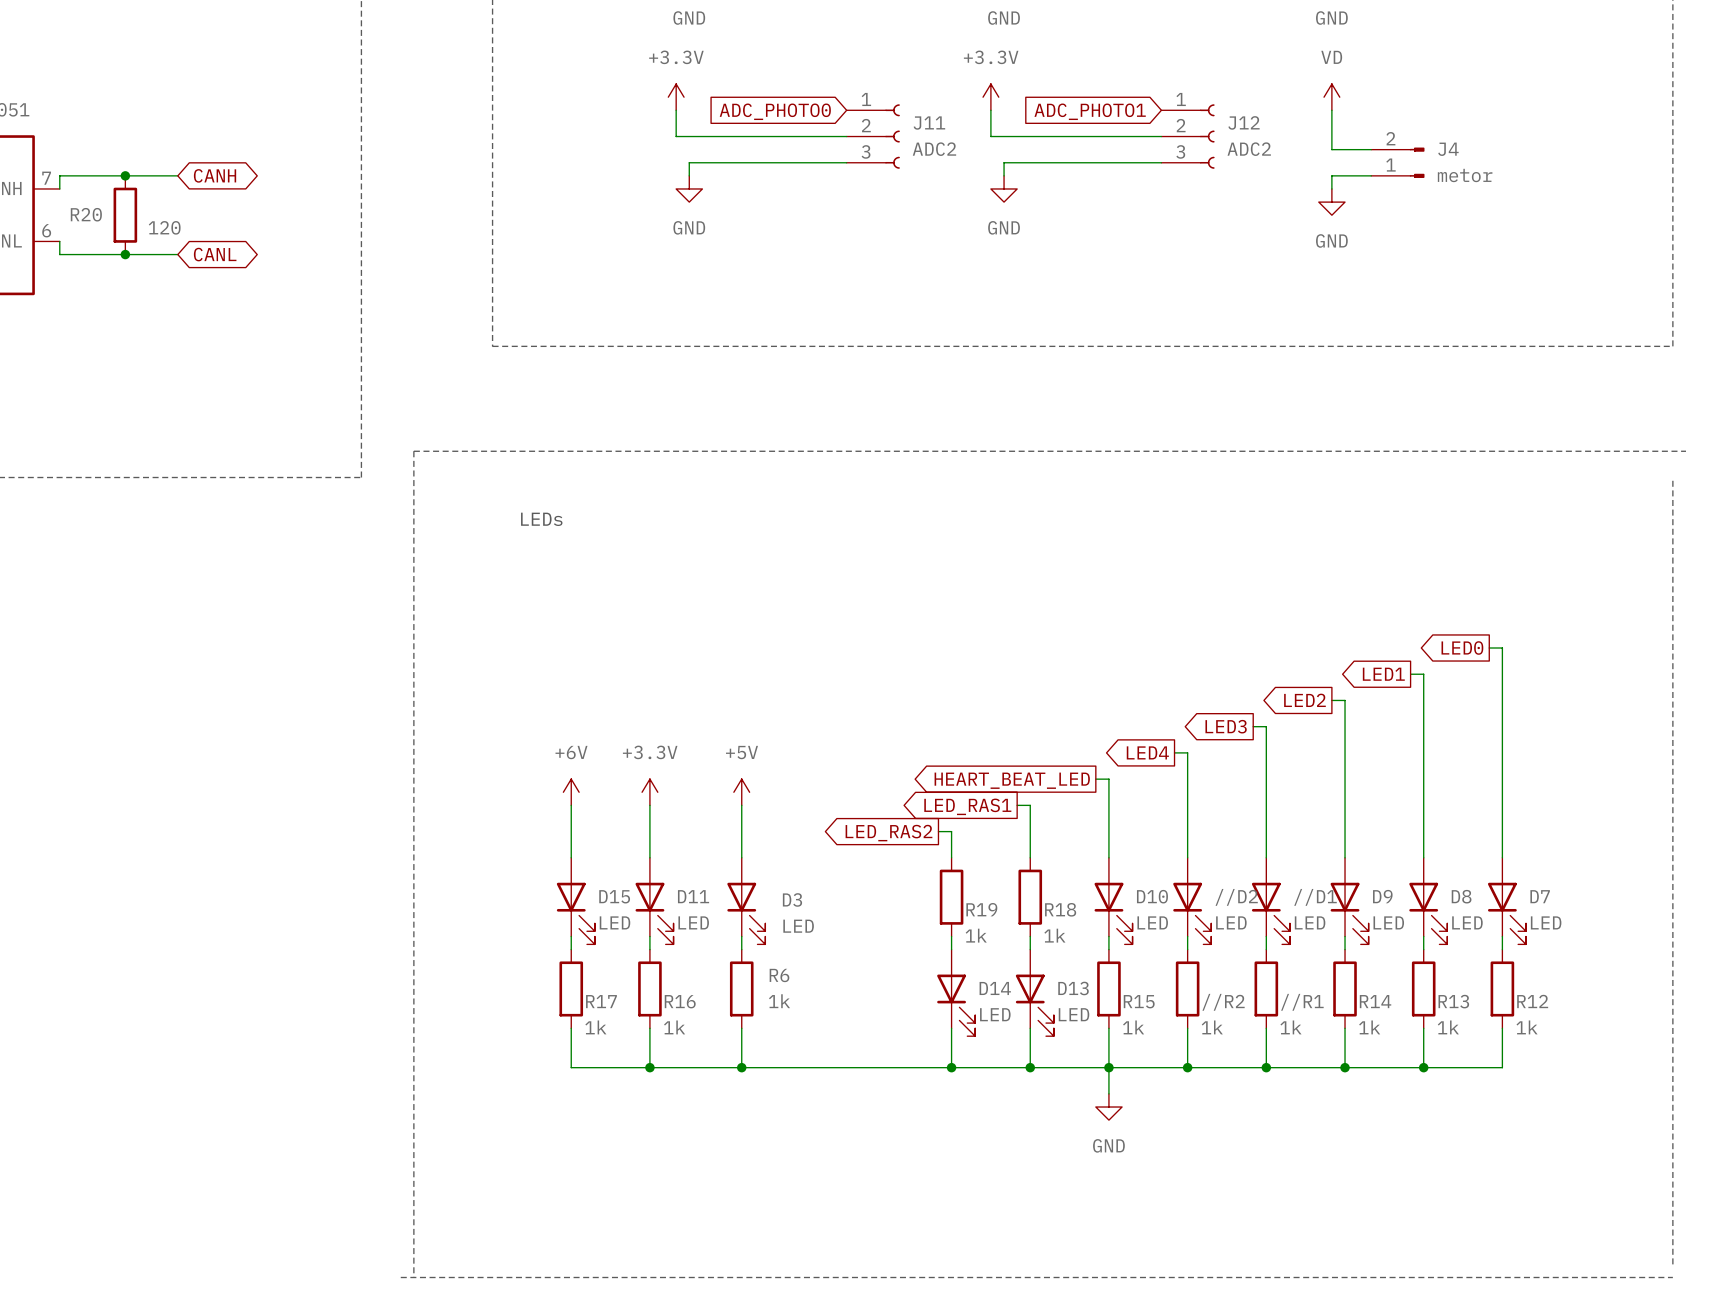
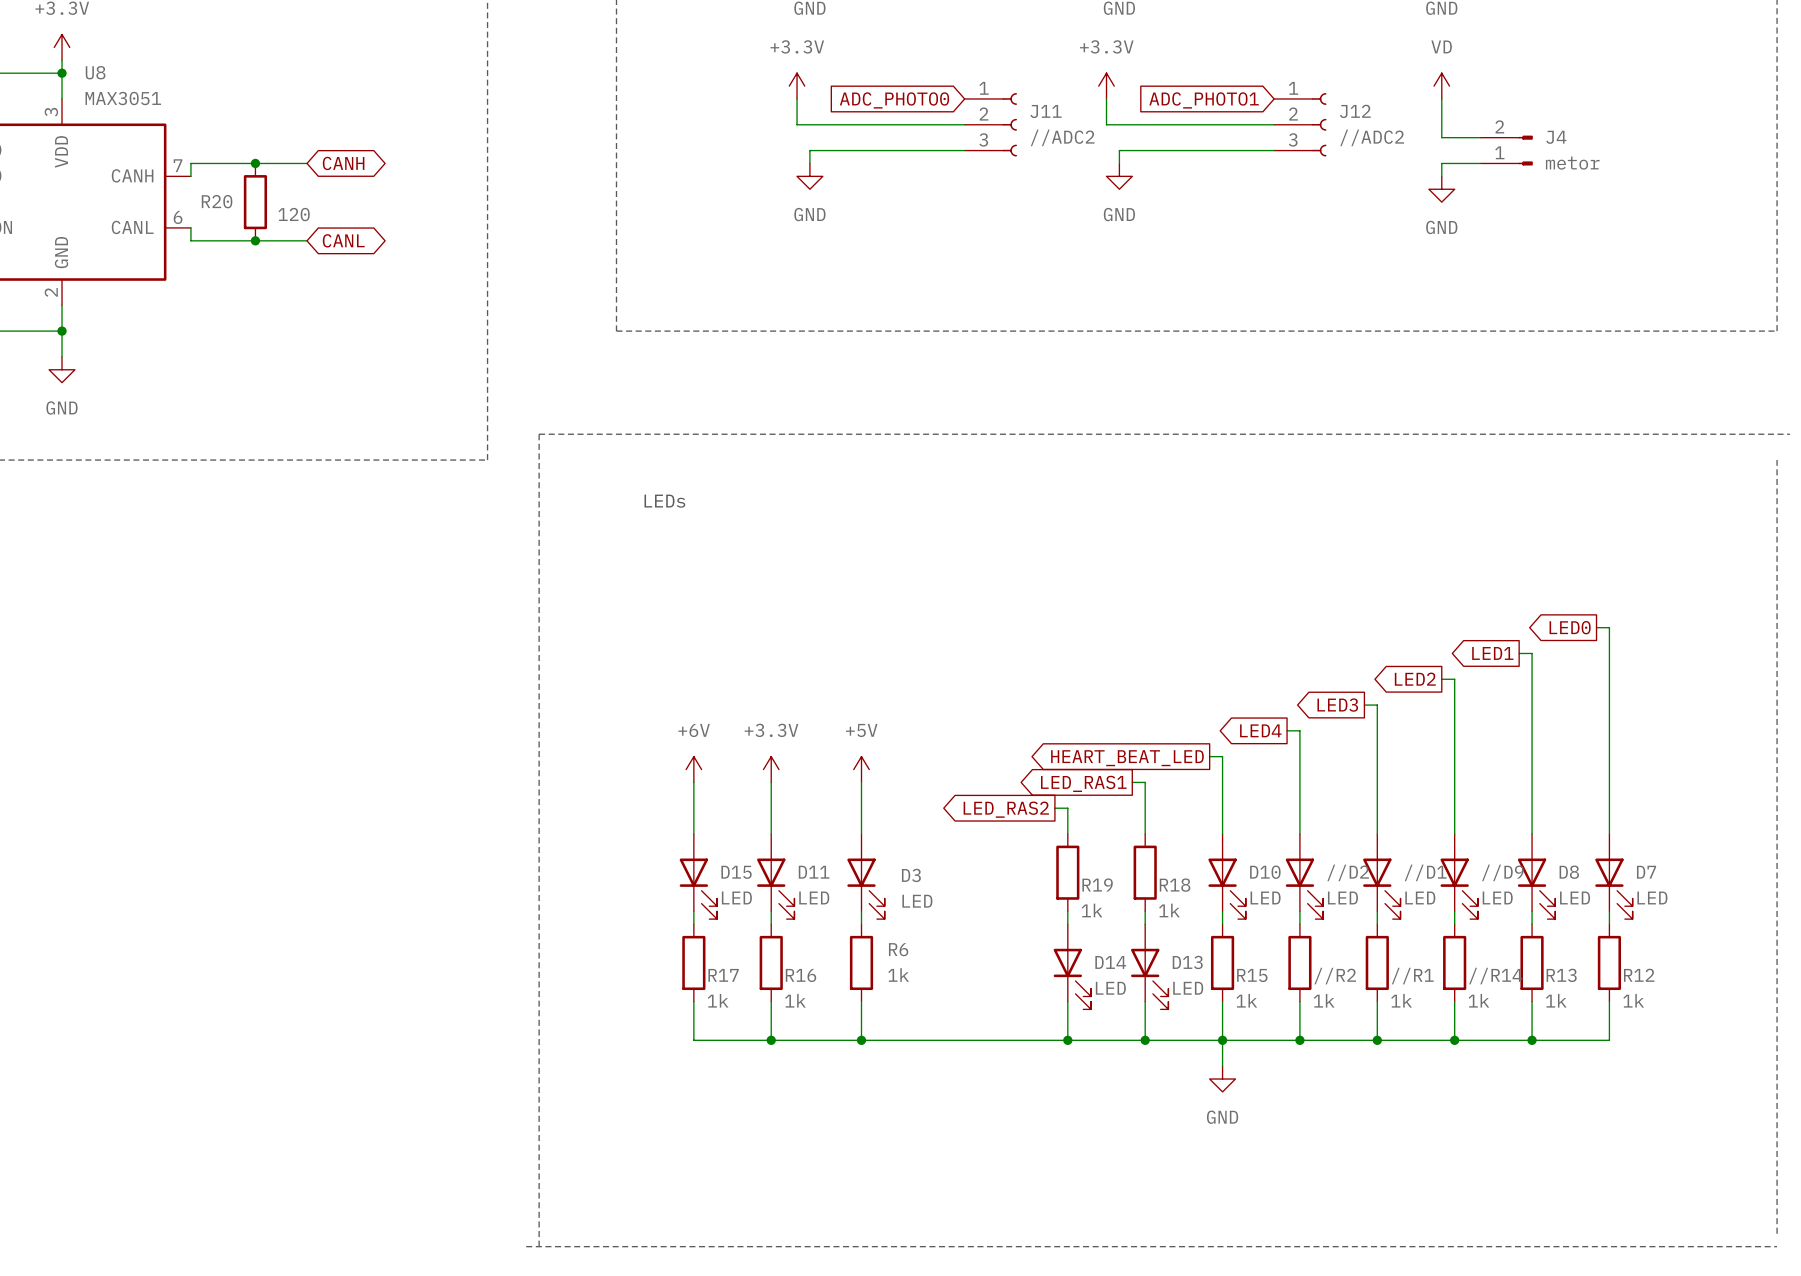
J11 value: ADC2 (934, 149) -> //ADC2 (1062, 137)
J12 value: ADC2 (1249, 149) -> //ADC2 (1372, 137)
D9 name: D9 (1382, 896) -> //D9 (1502, 872)
R14 name: R14 (1375, 1001) -> //R14 (1495, 976)

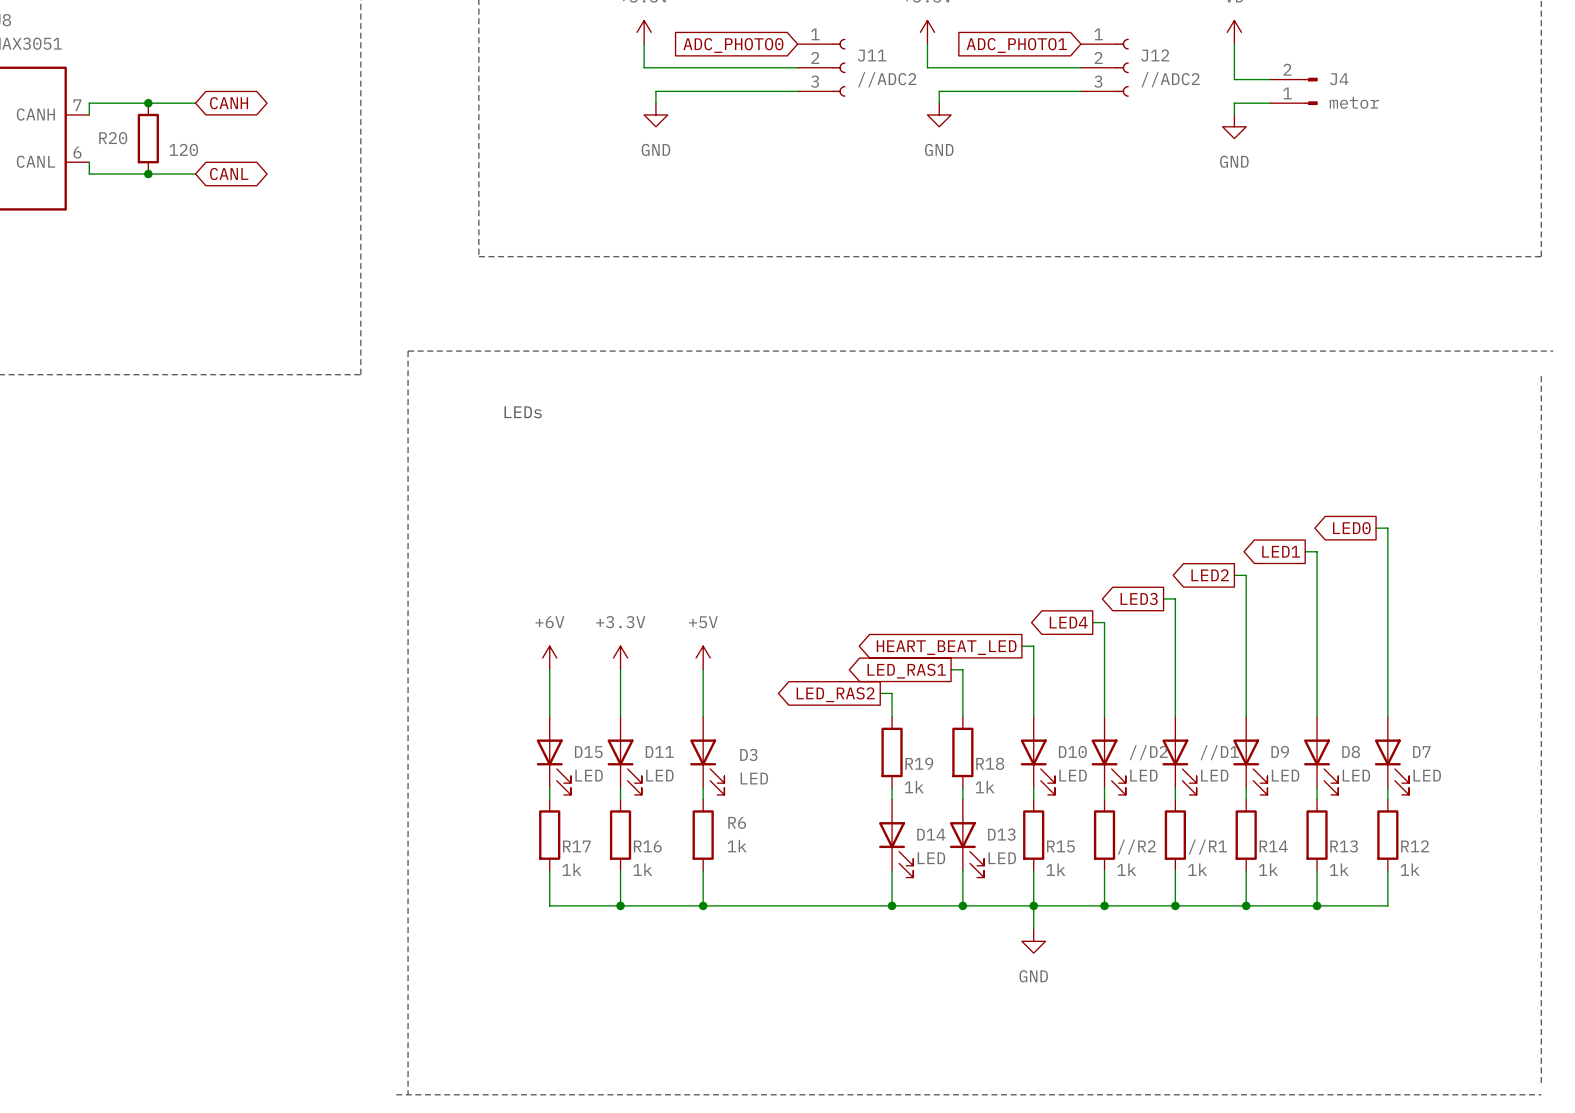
//D9 name: //D9 (1502, 872) -> D9 (1280, 751)
//R14 name: //R14 (1495, 976) -> R14 (1273, 846)

